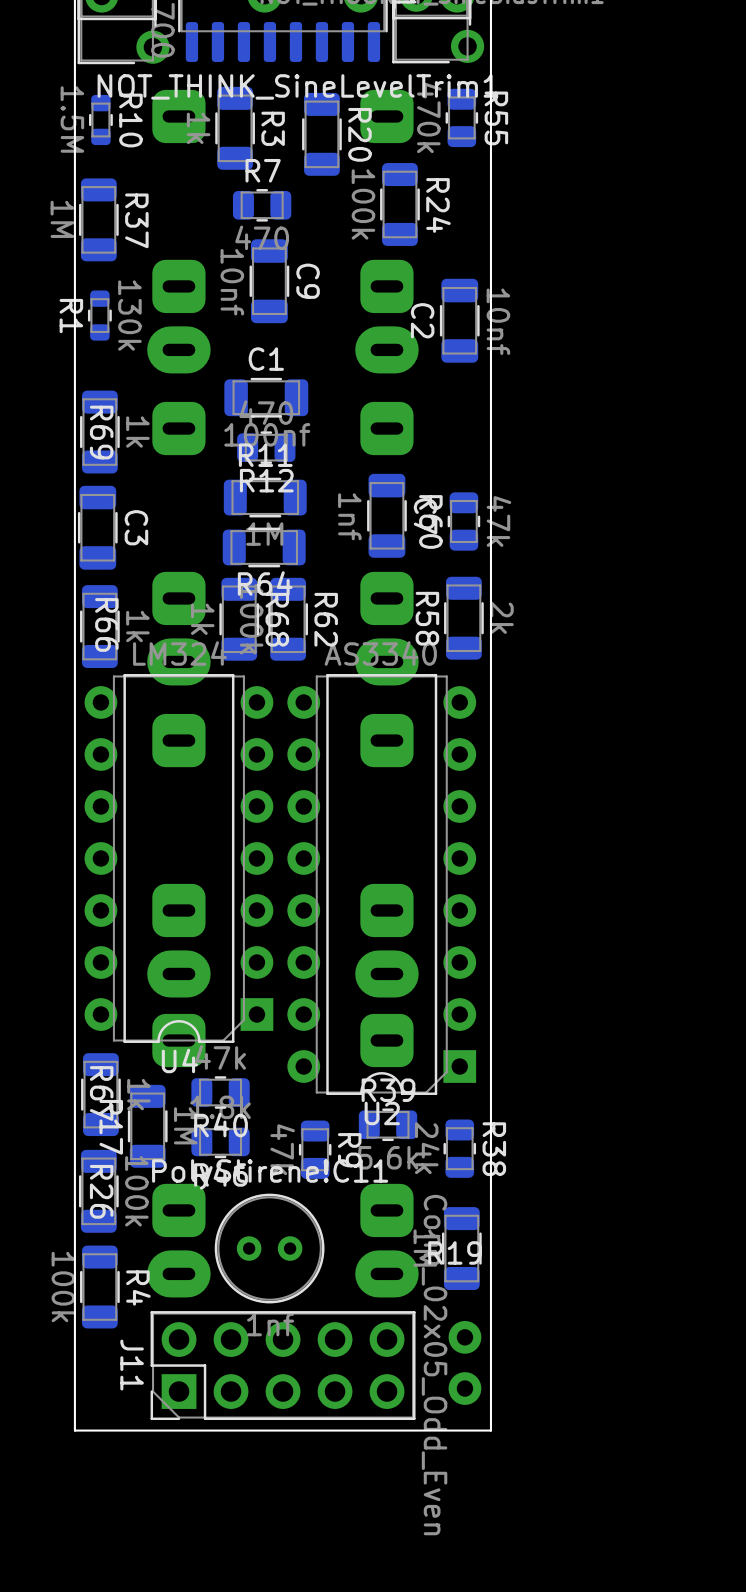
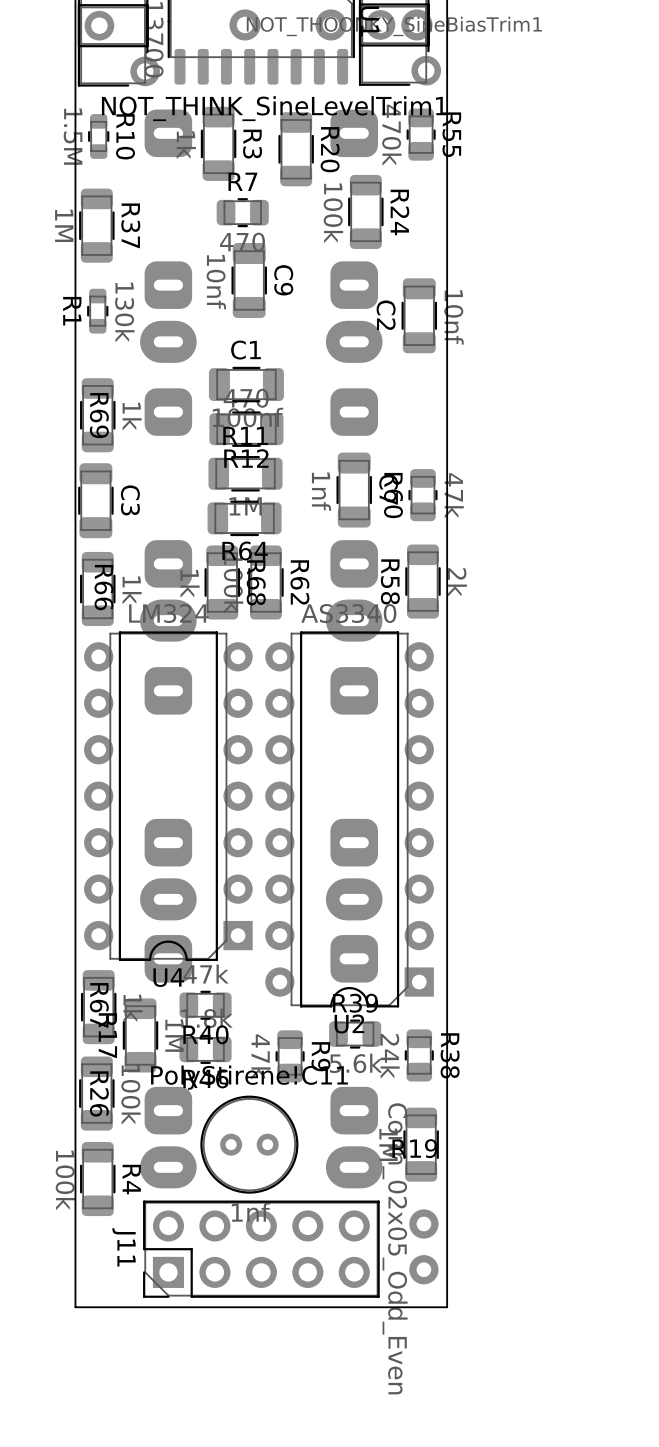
R12 footprint: [237, 431, 296, 464] -> [209, 411, 284, 447]

